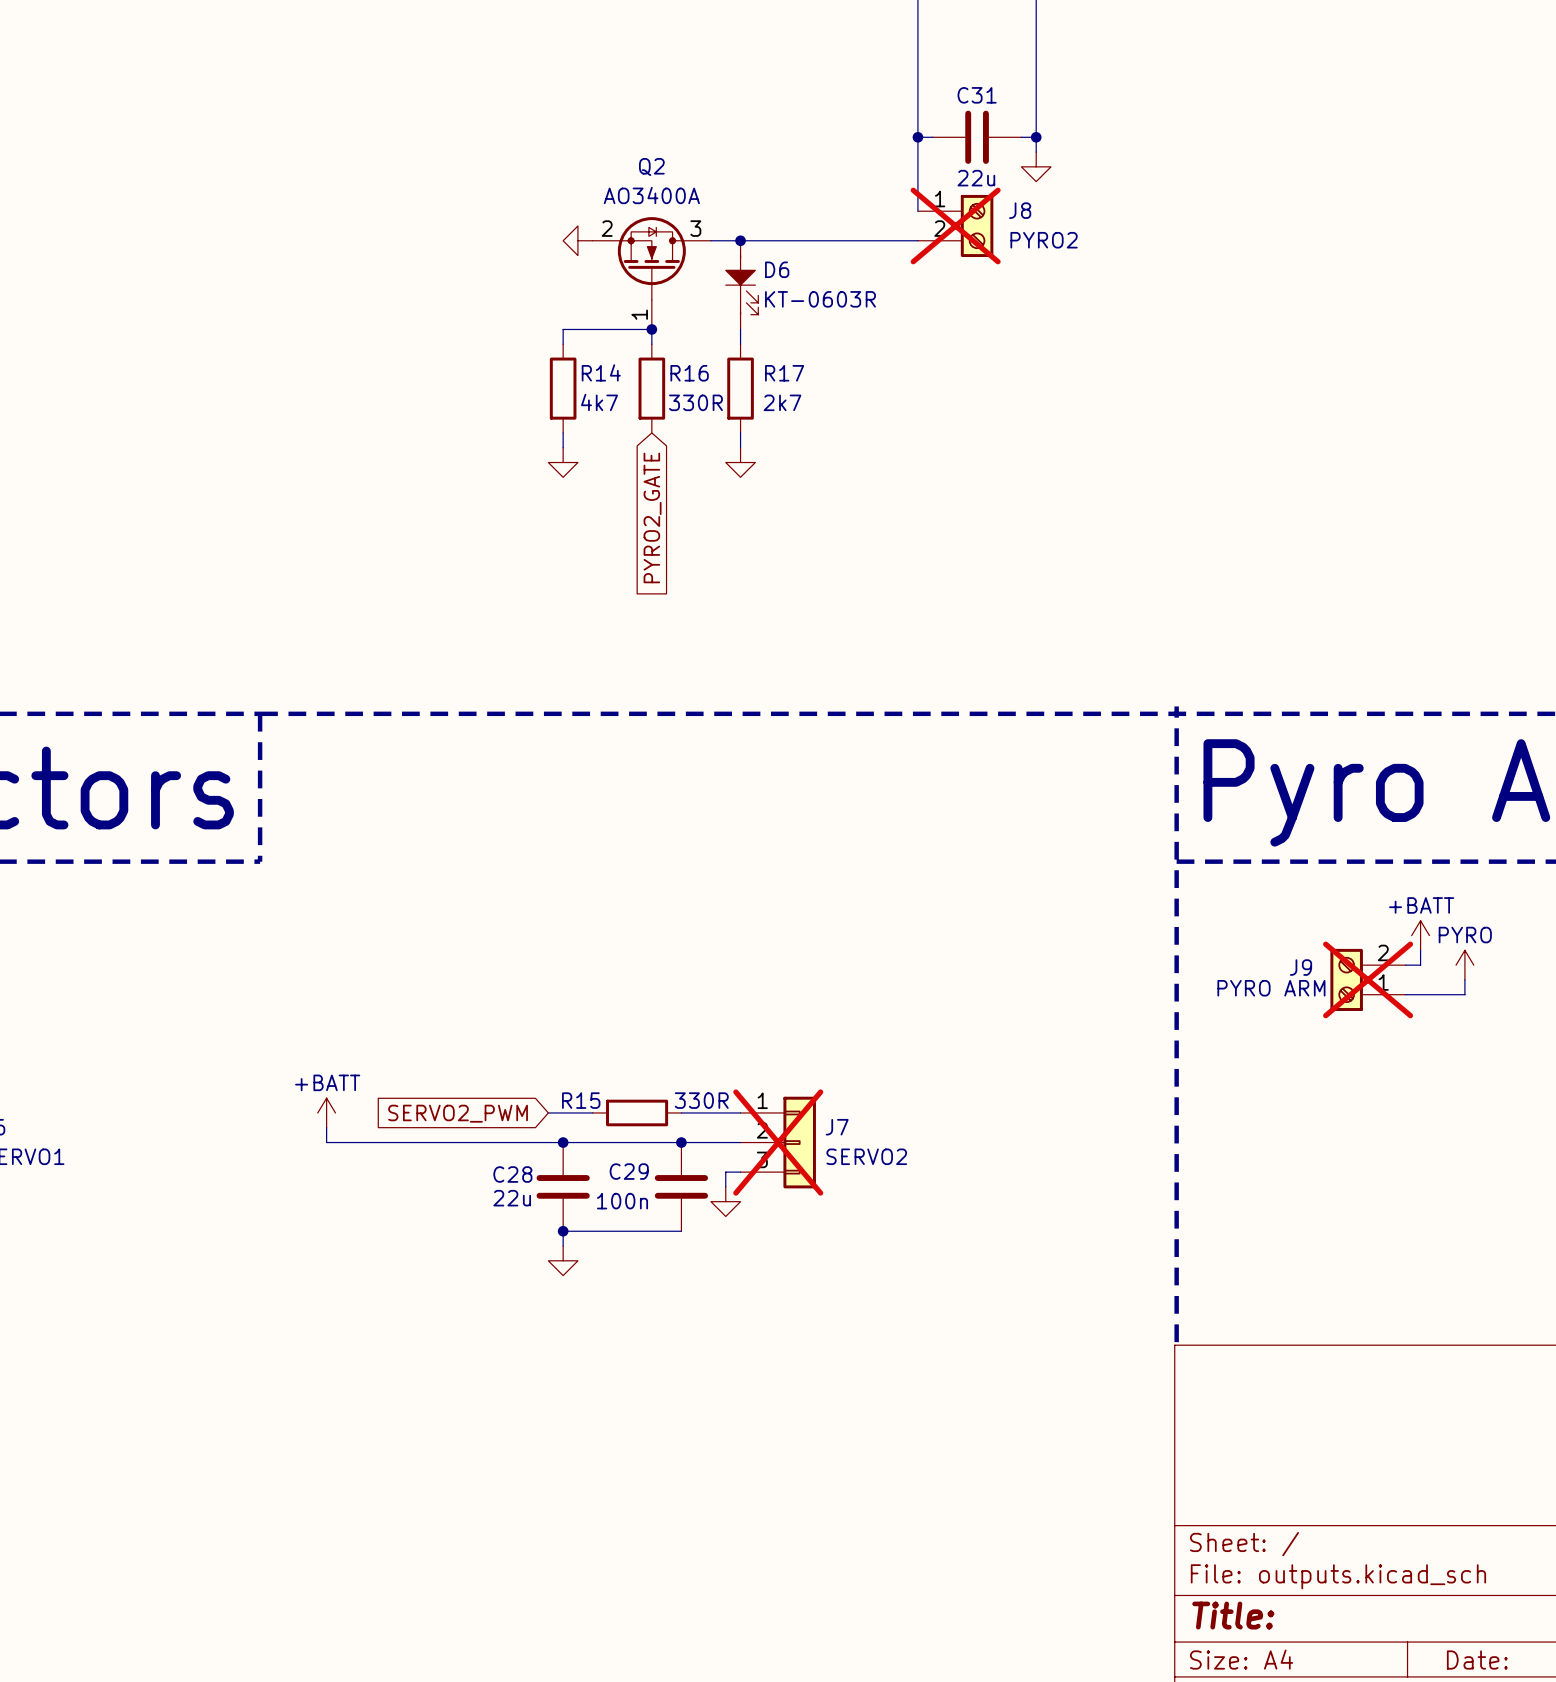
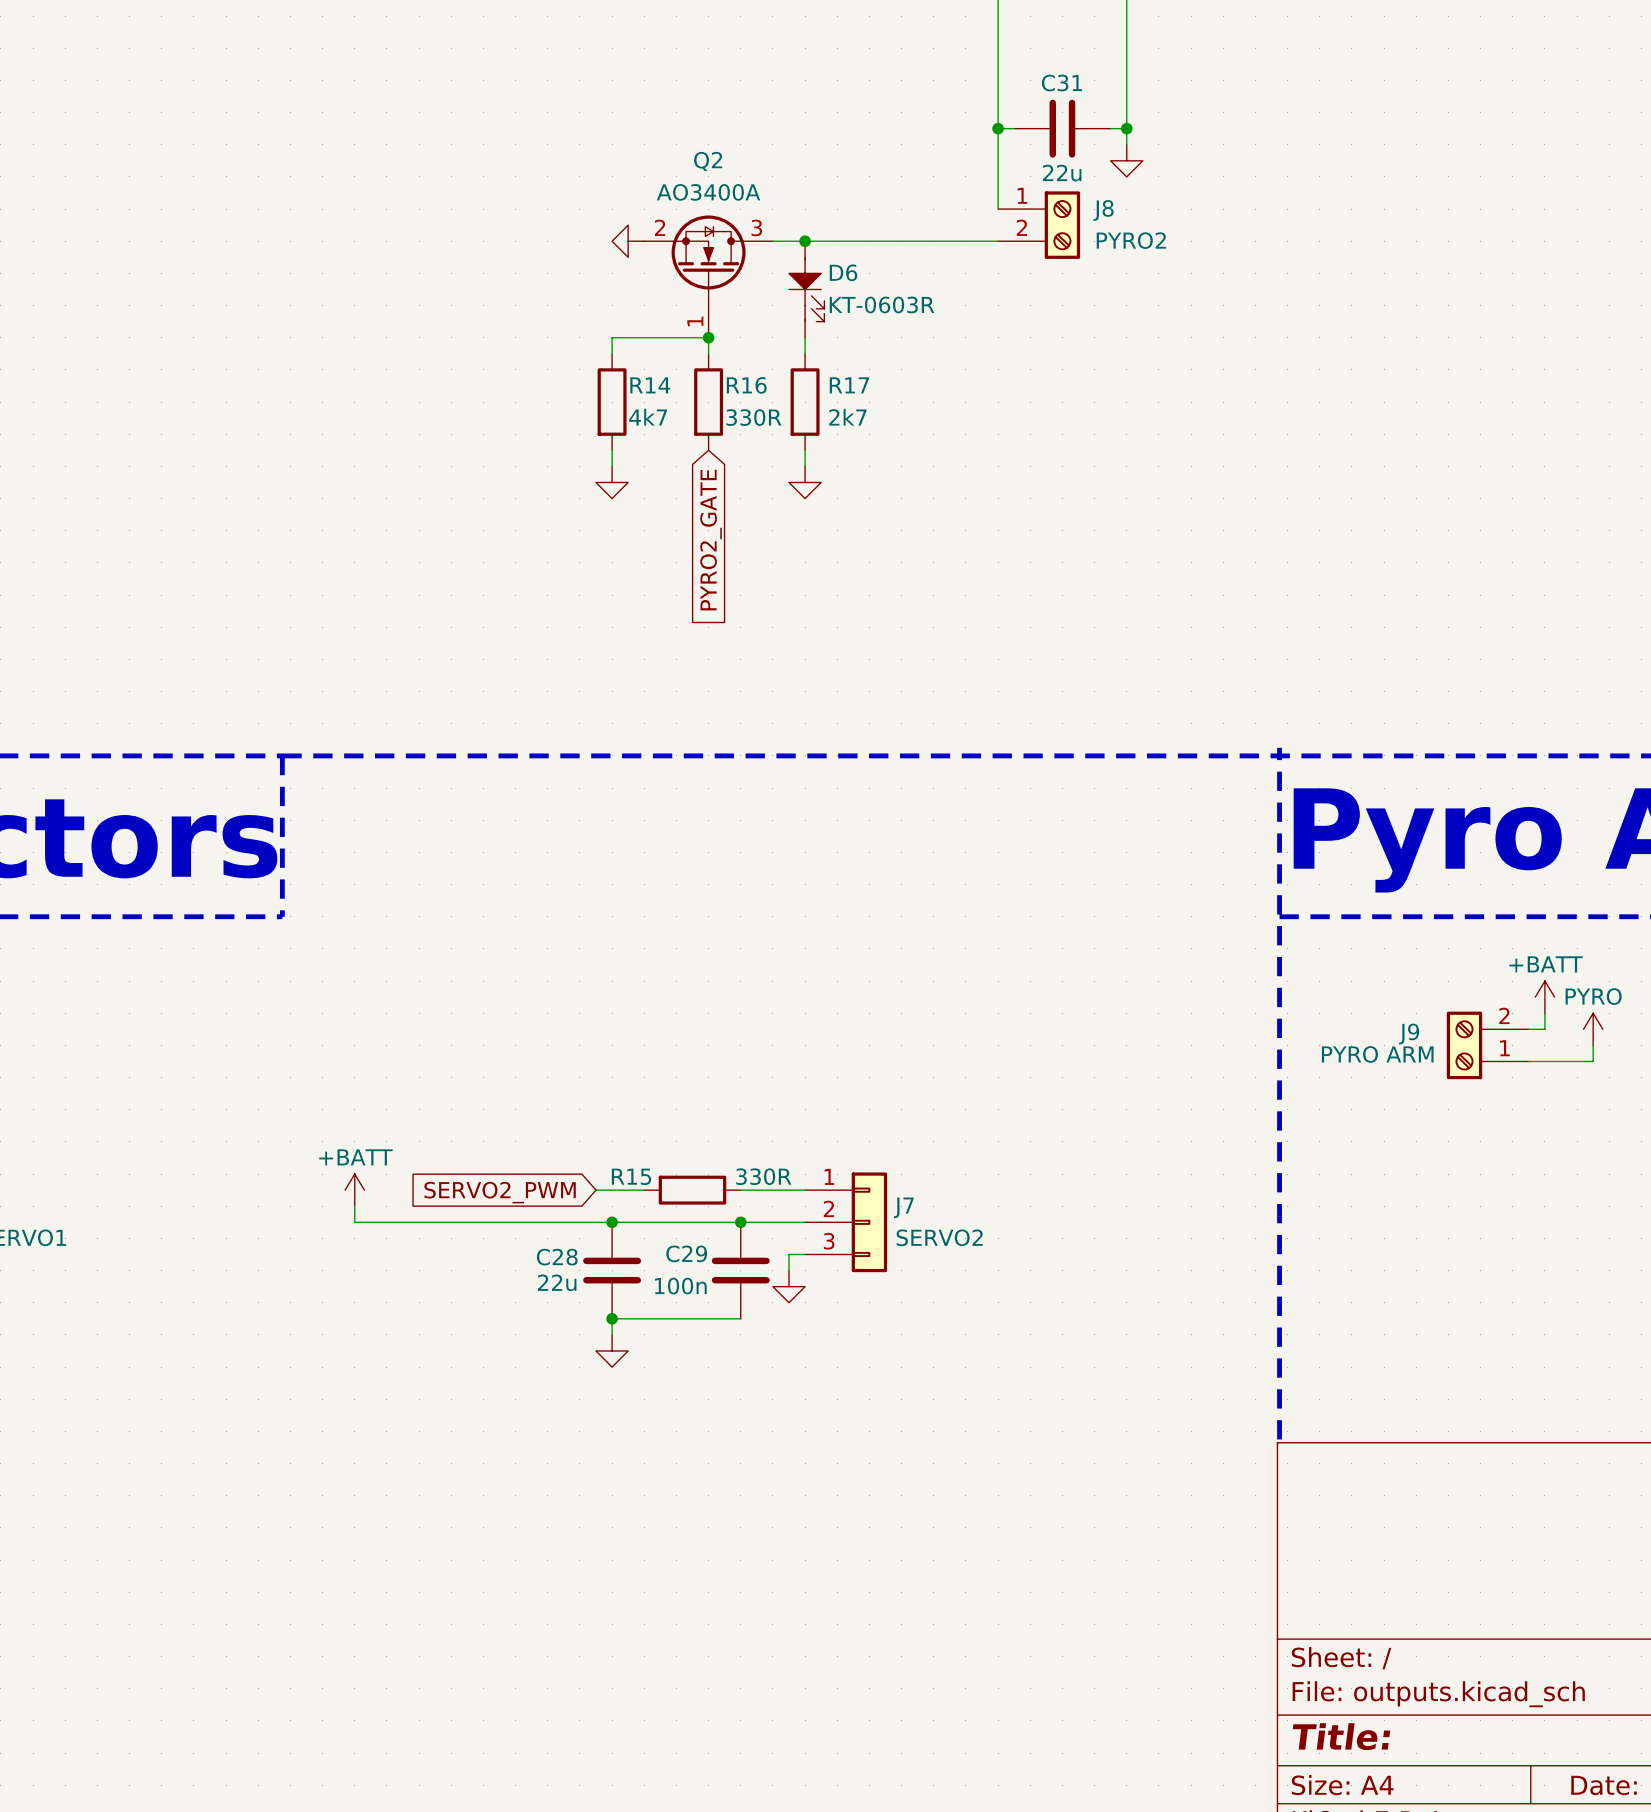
J8 do-not-place cross: (955, 225) -> none
J9 do-not-place cross: (1368, 979) -> none
J7 do-not-place cross: (778, 1142) -> none

